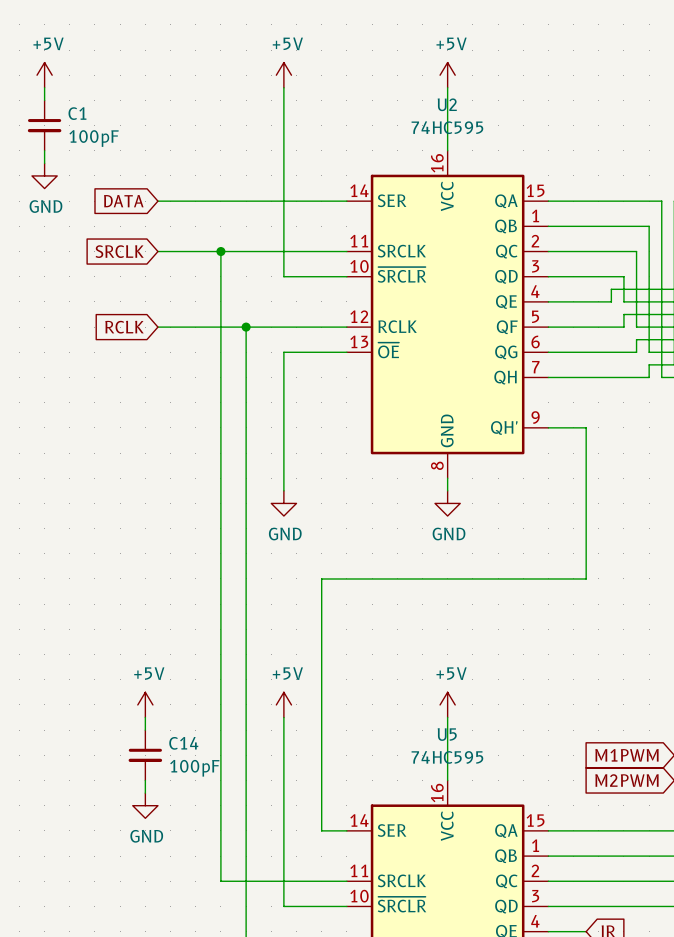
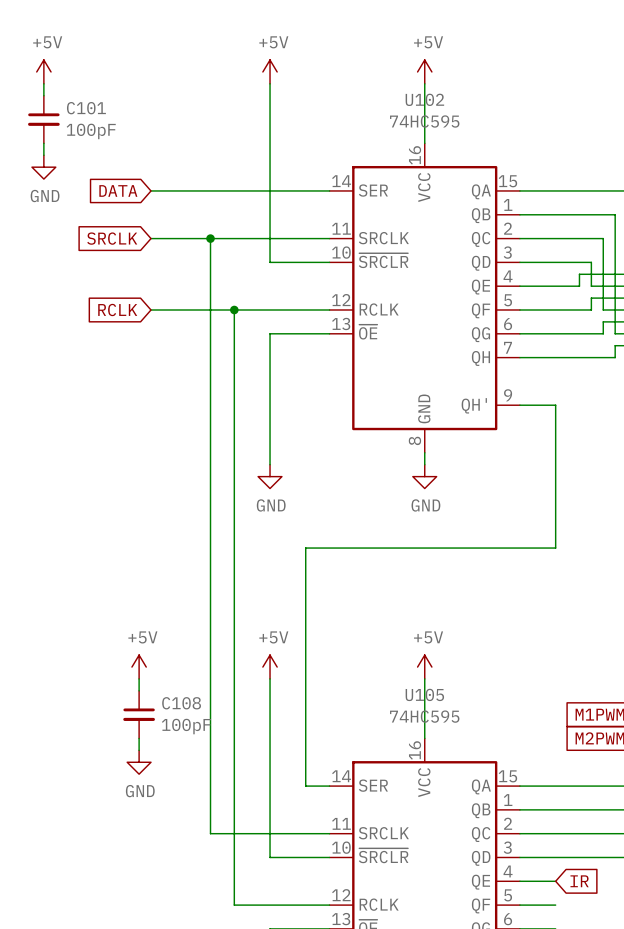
U2 name: U2 (447, 104) -> U102 (424, 99)
C1 name: C1 (77, 113) -> C101 (86, 108)
U5 name: U5 (447, 734) -> U105 (424, 694)
C14 name: C14 (183, 743) -> C108 (181, 703)

